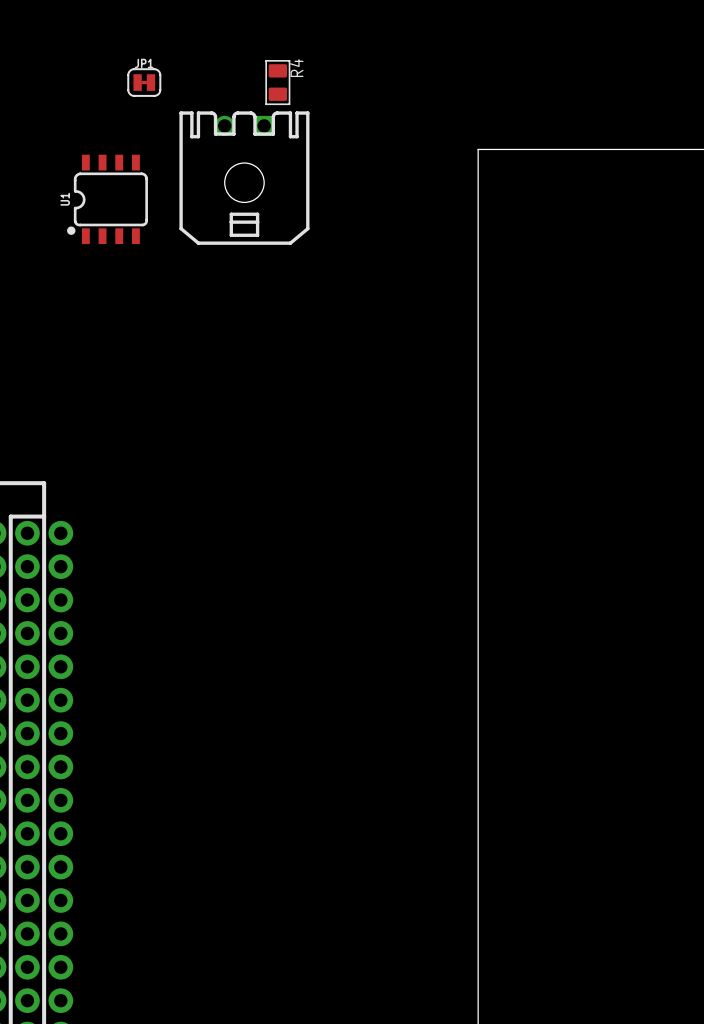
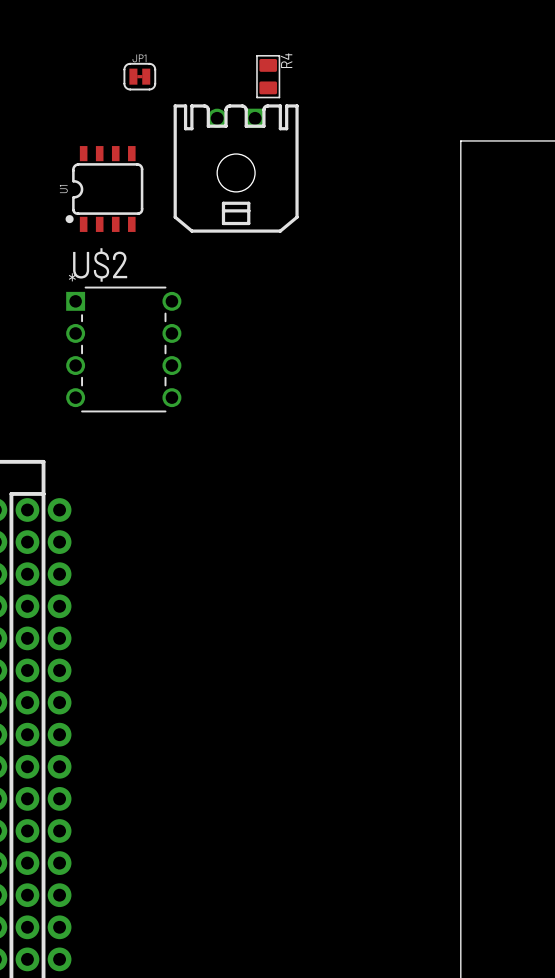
U$2: none -> (123, 349)

